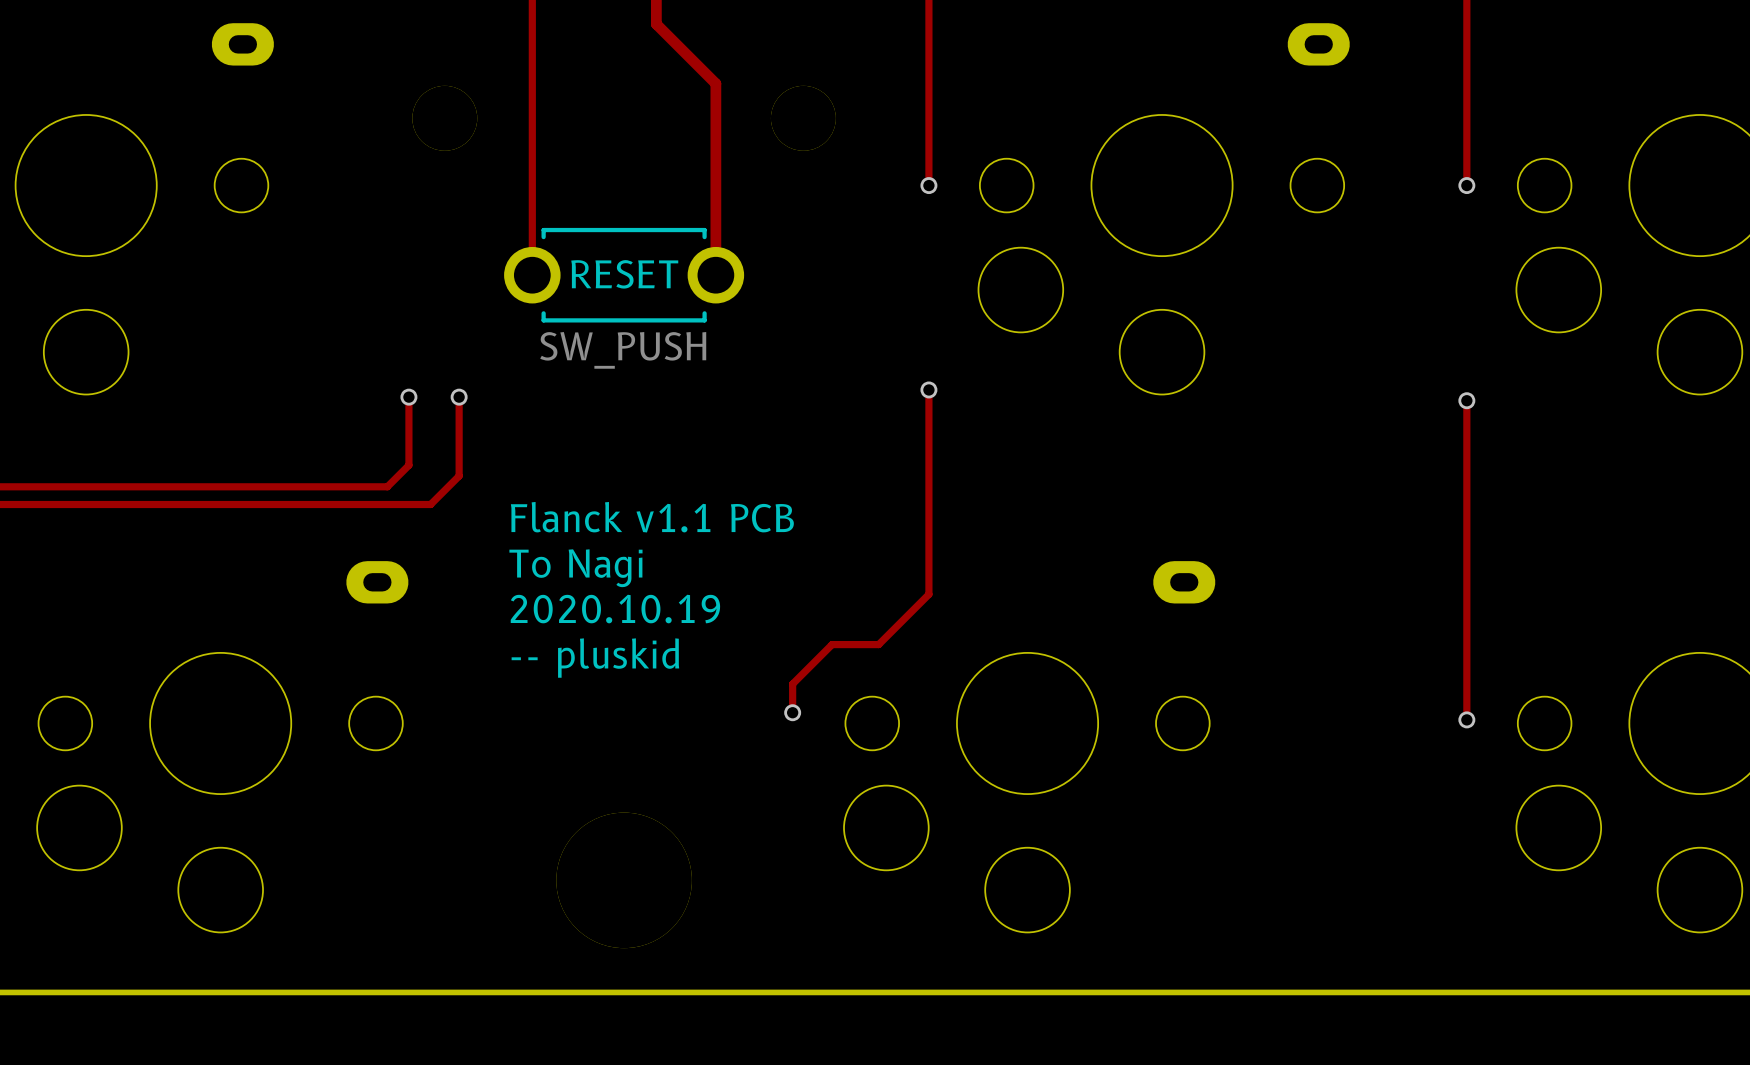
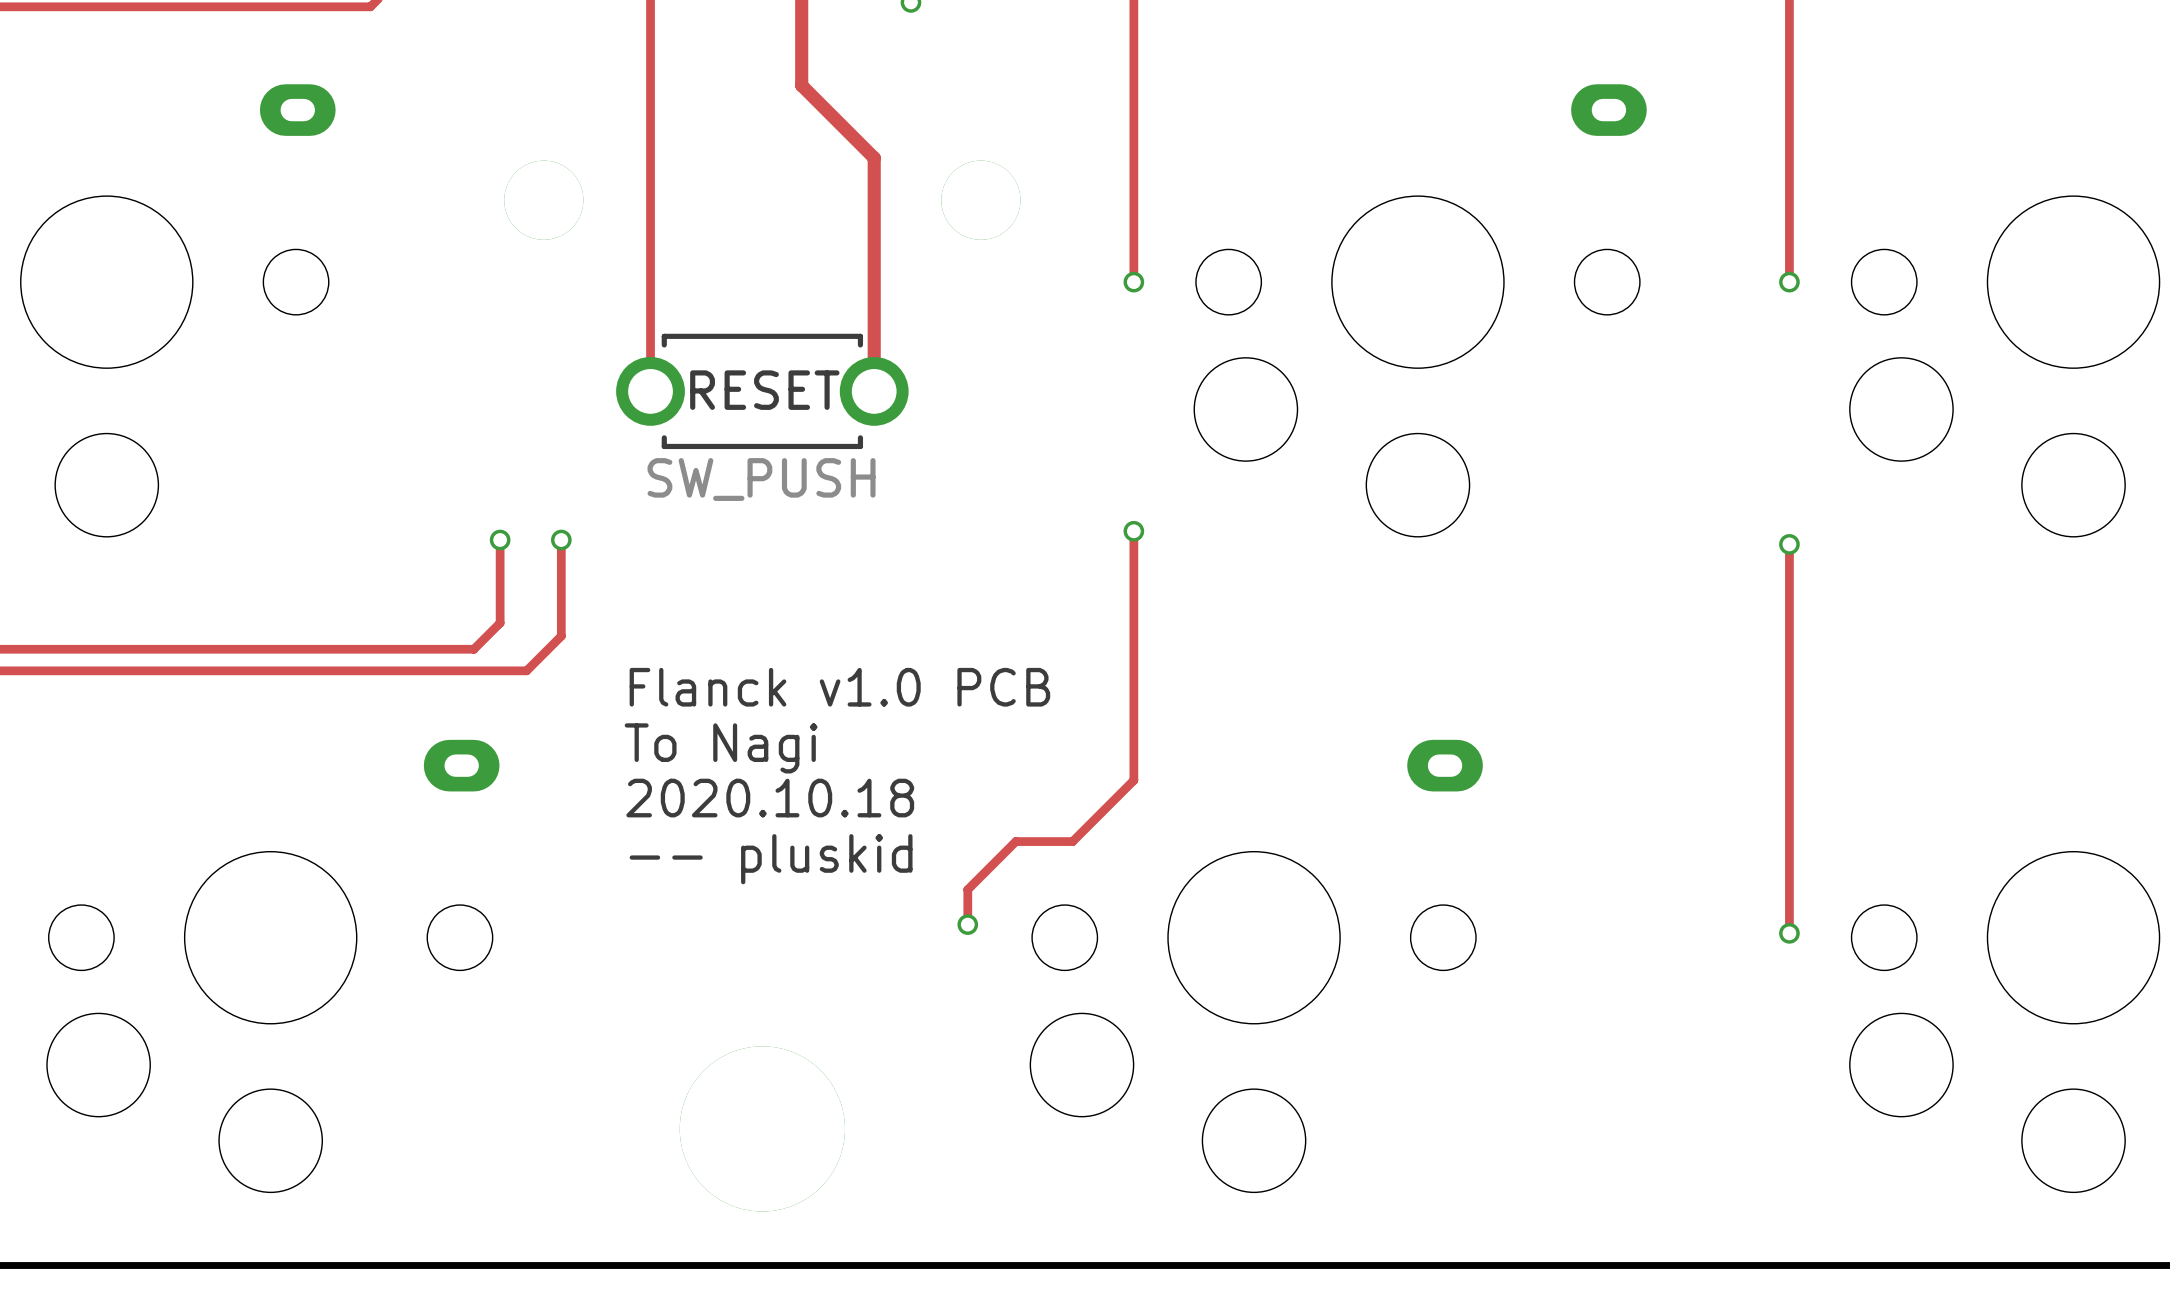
text: Flanck v1.1 PCB (652, 517) -> Flanck v1.0 PCB (839, 687)
text: 2020.10.19 (615, 609) -> 2020.10.18 (770, 798)

